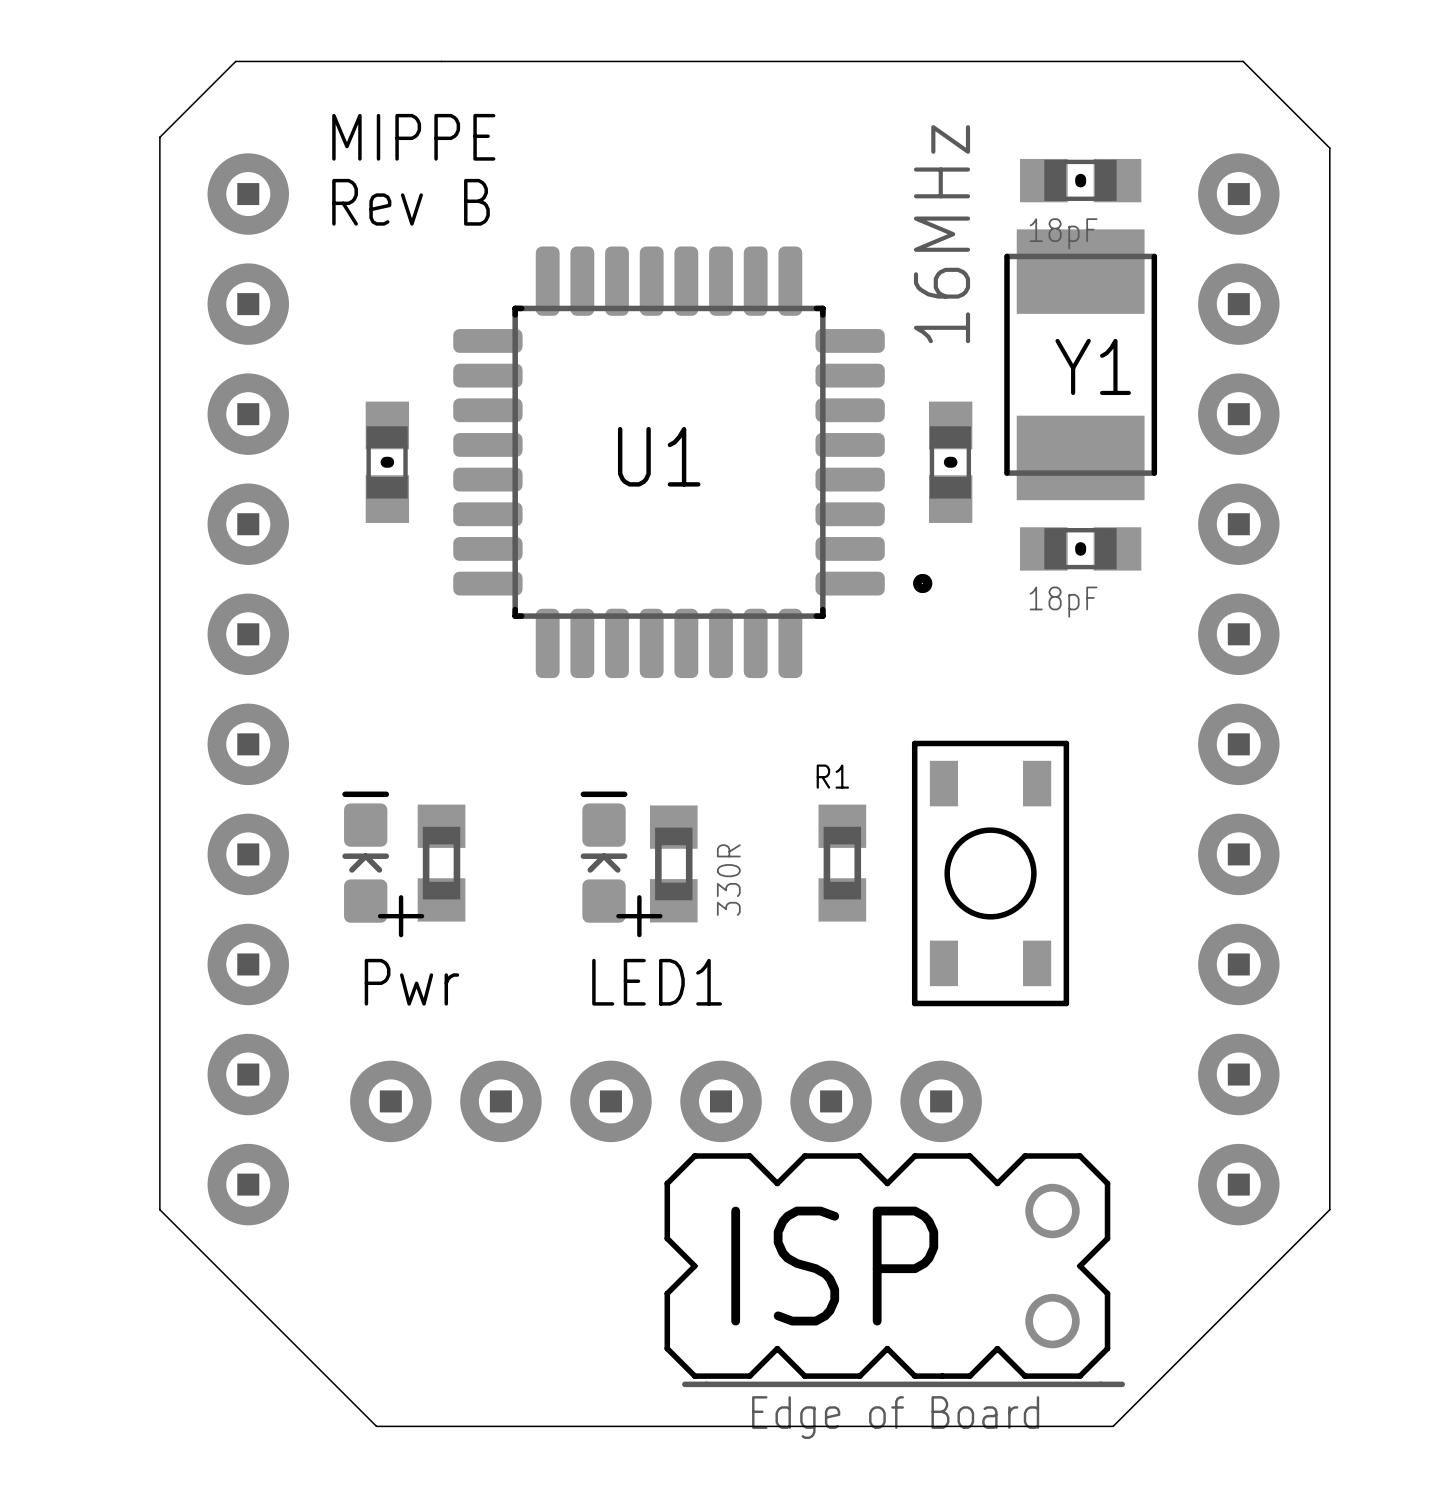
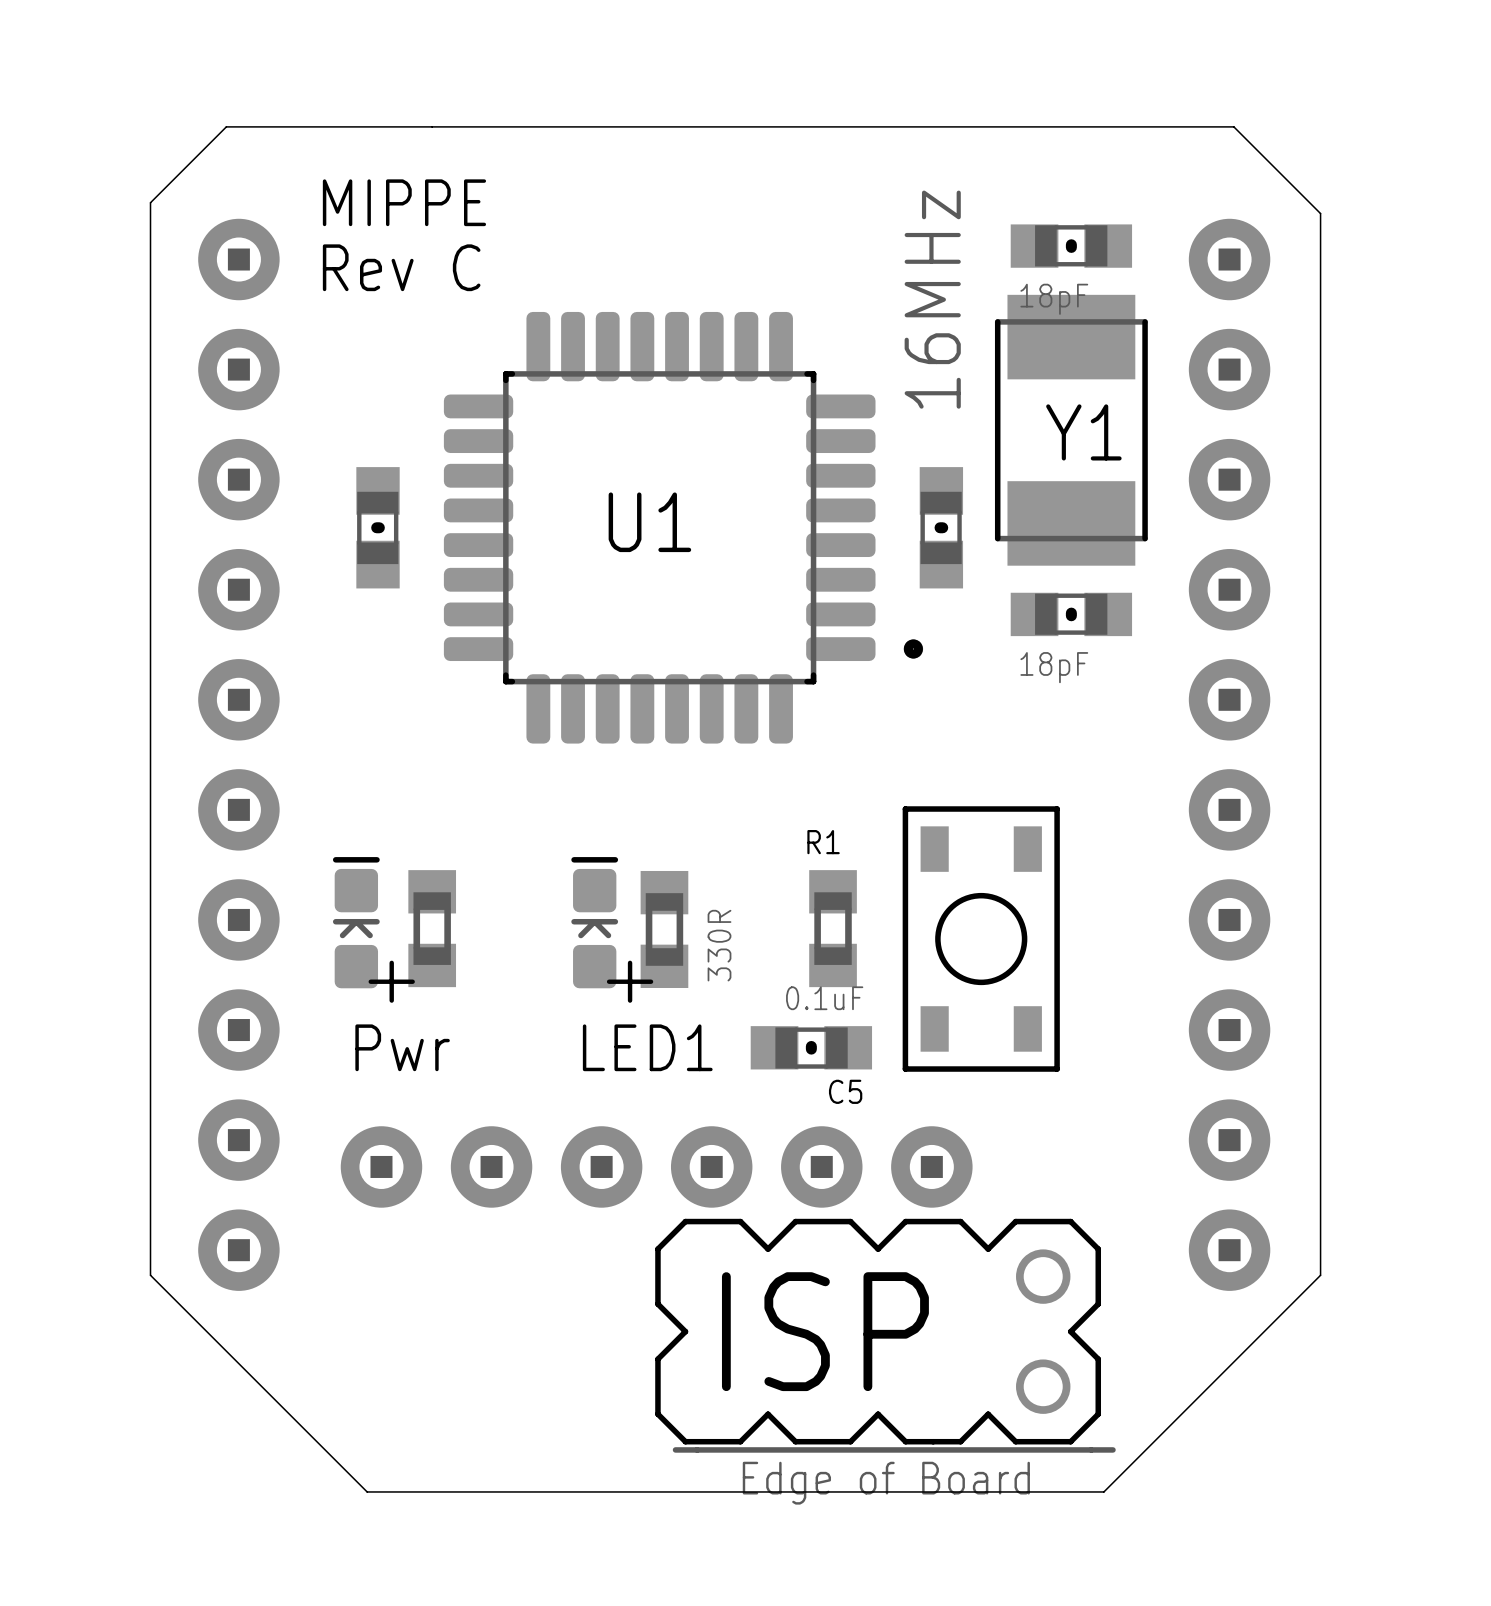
text: Rev B (411, 202) -> Rev C (401, 267)
C5: none -> 0.1uF (811, 1047)

